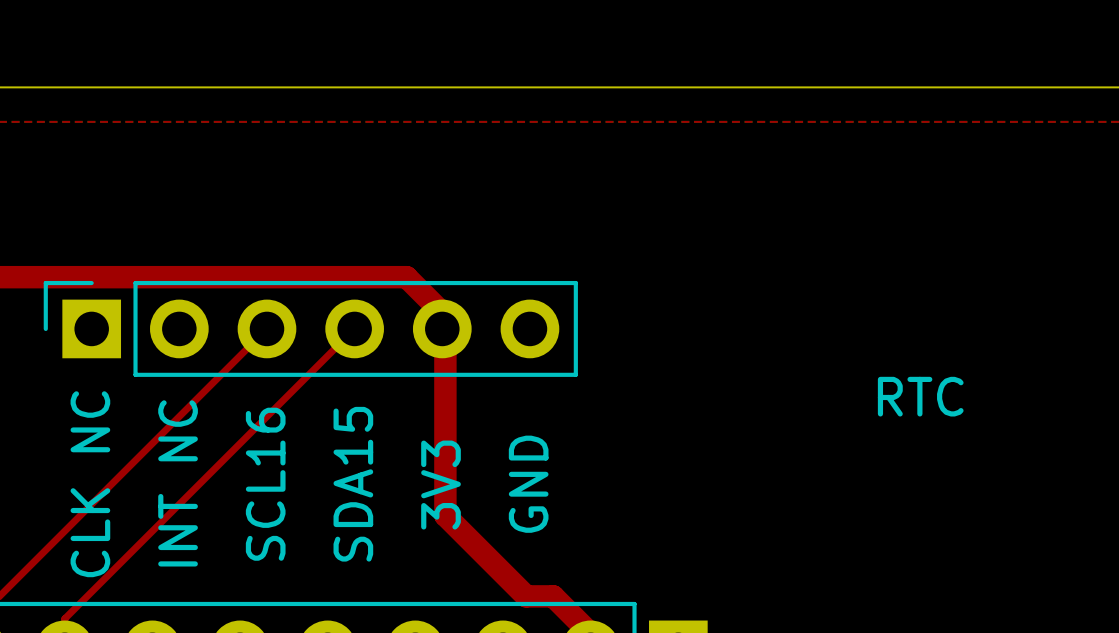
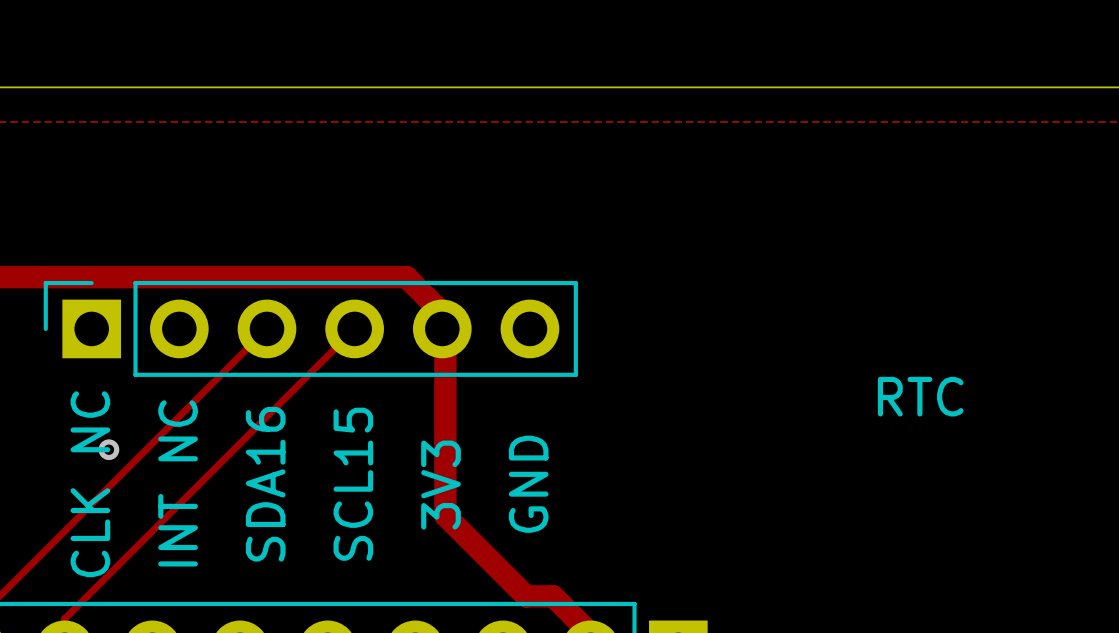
via: none -> (108, 449)
text: SCL16 (265, 484) -> SDA16 (265, 484)
text: SDA15 (353, 484) -> SCL15 (353, 484)

